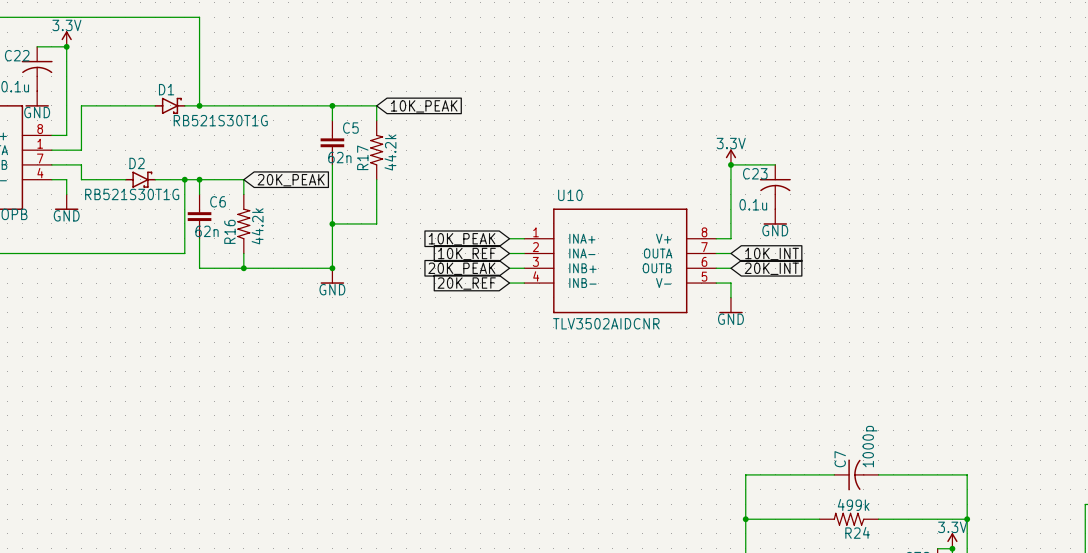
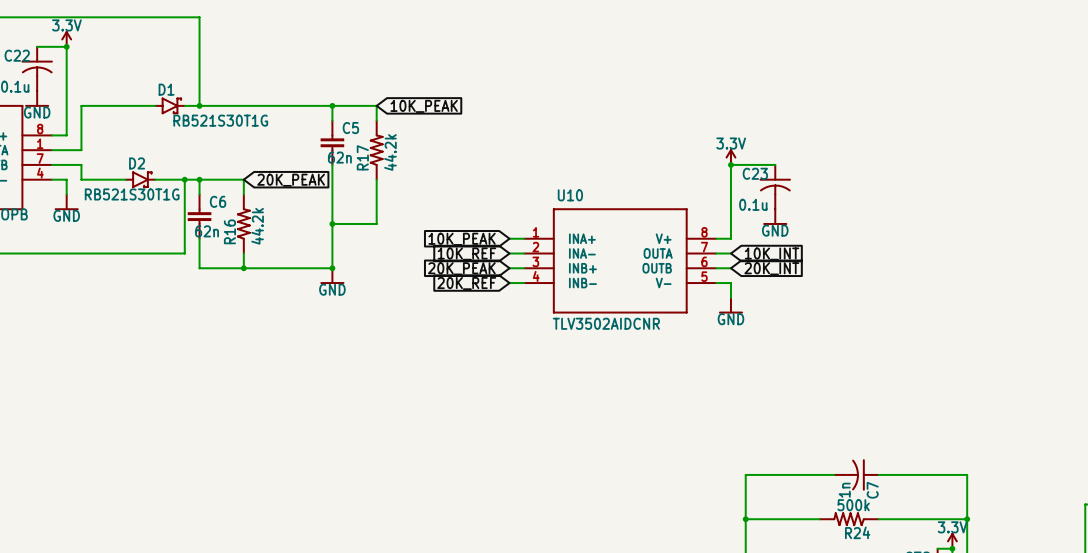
C7 value: 1000p (869, 446) -> 1n (844, 490)
C7 rotation: 0° (856, 474) -> 180° (856, 474)
R24 value: 499k (853, 504) -> 500k (853, 505)

